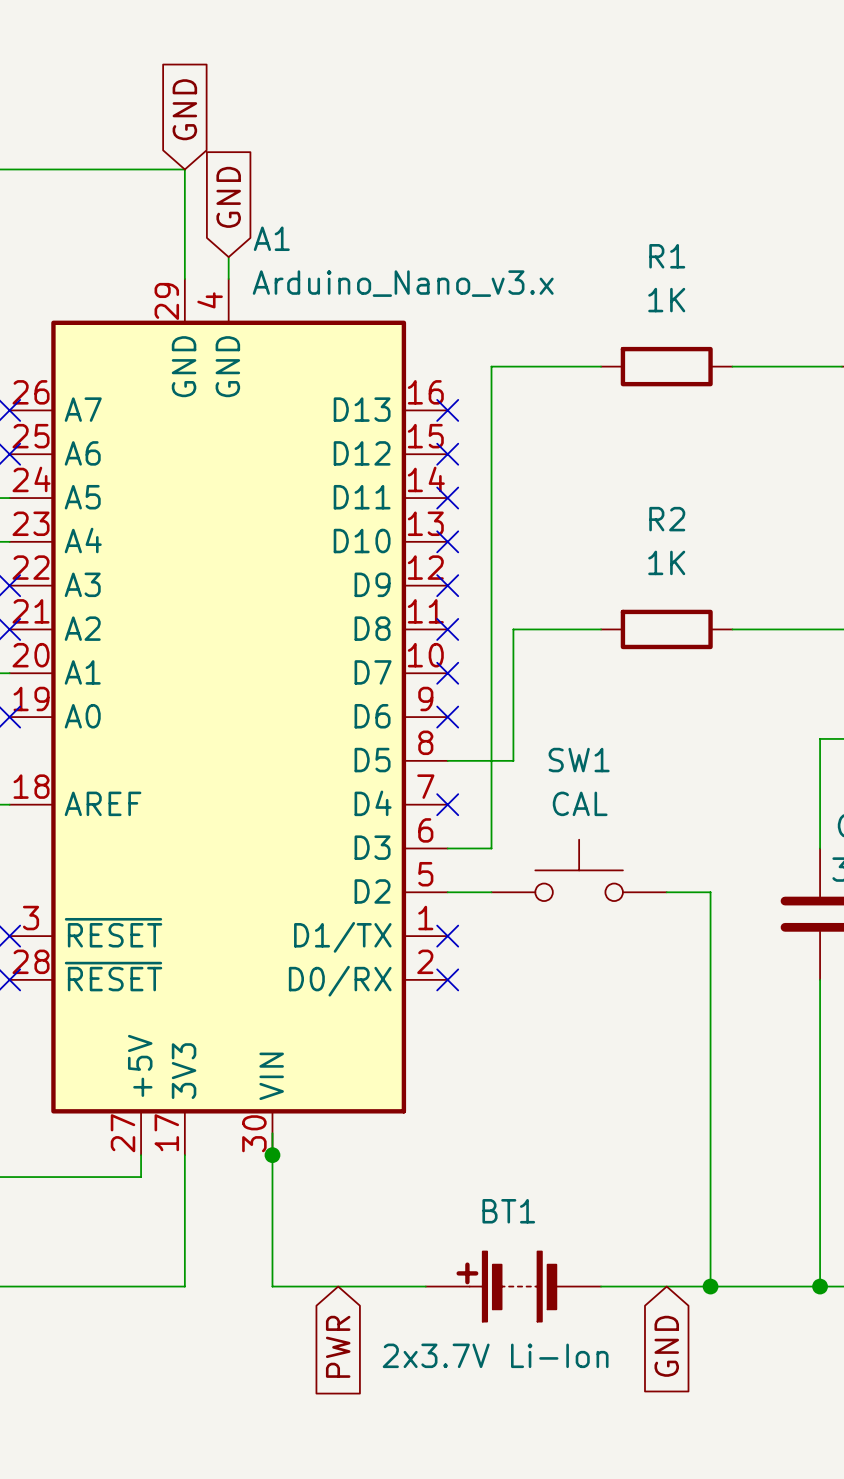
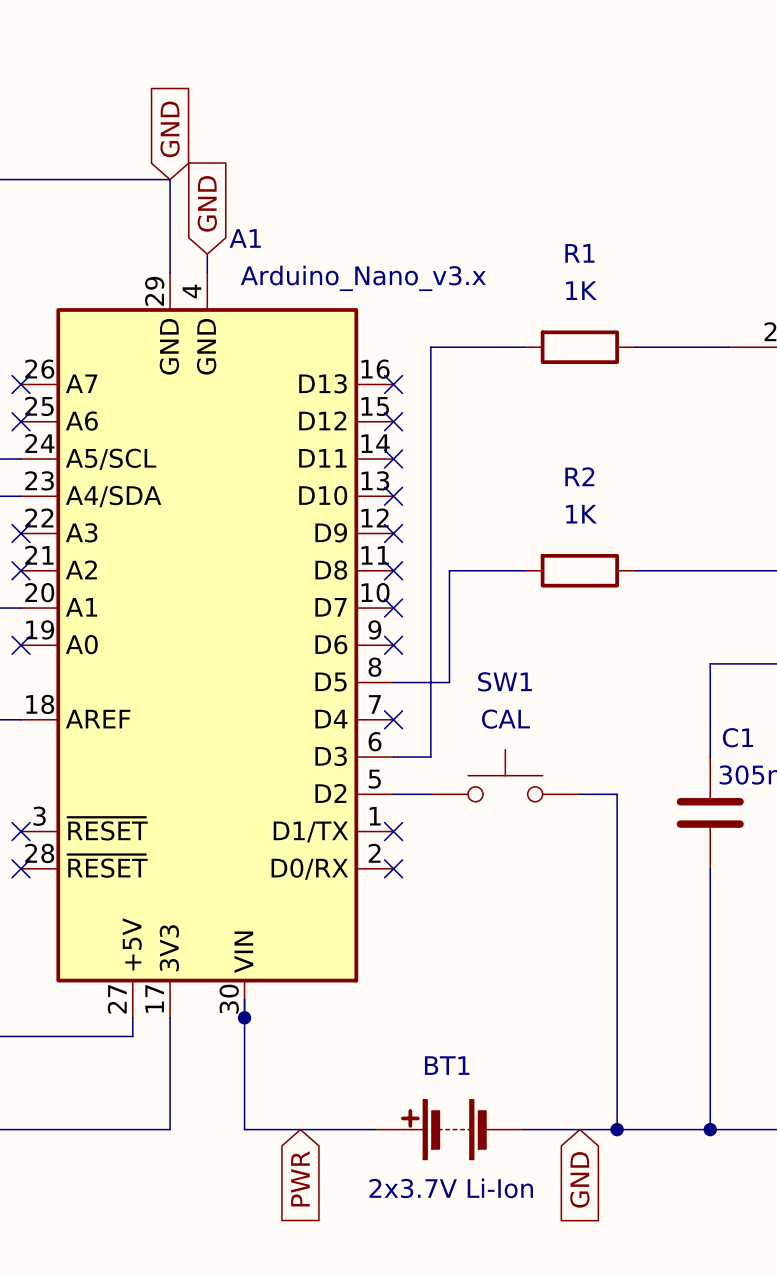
A1 pin name: A5 (82, 497) -> A5/SCL (111, 459)
A1 pin name: A4 (83, 540) -> A4/SDA (113, 496)

